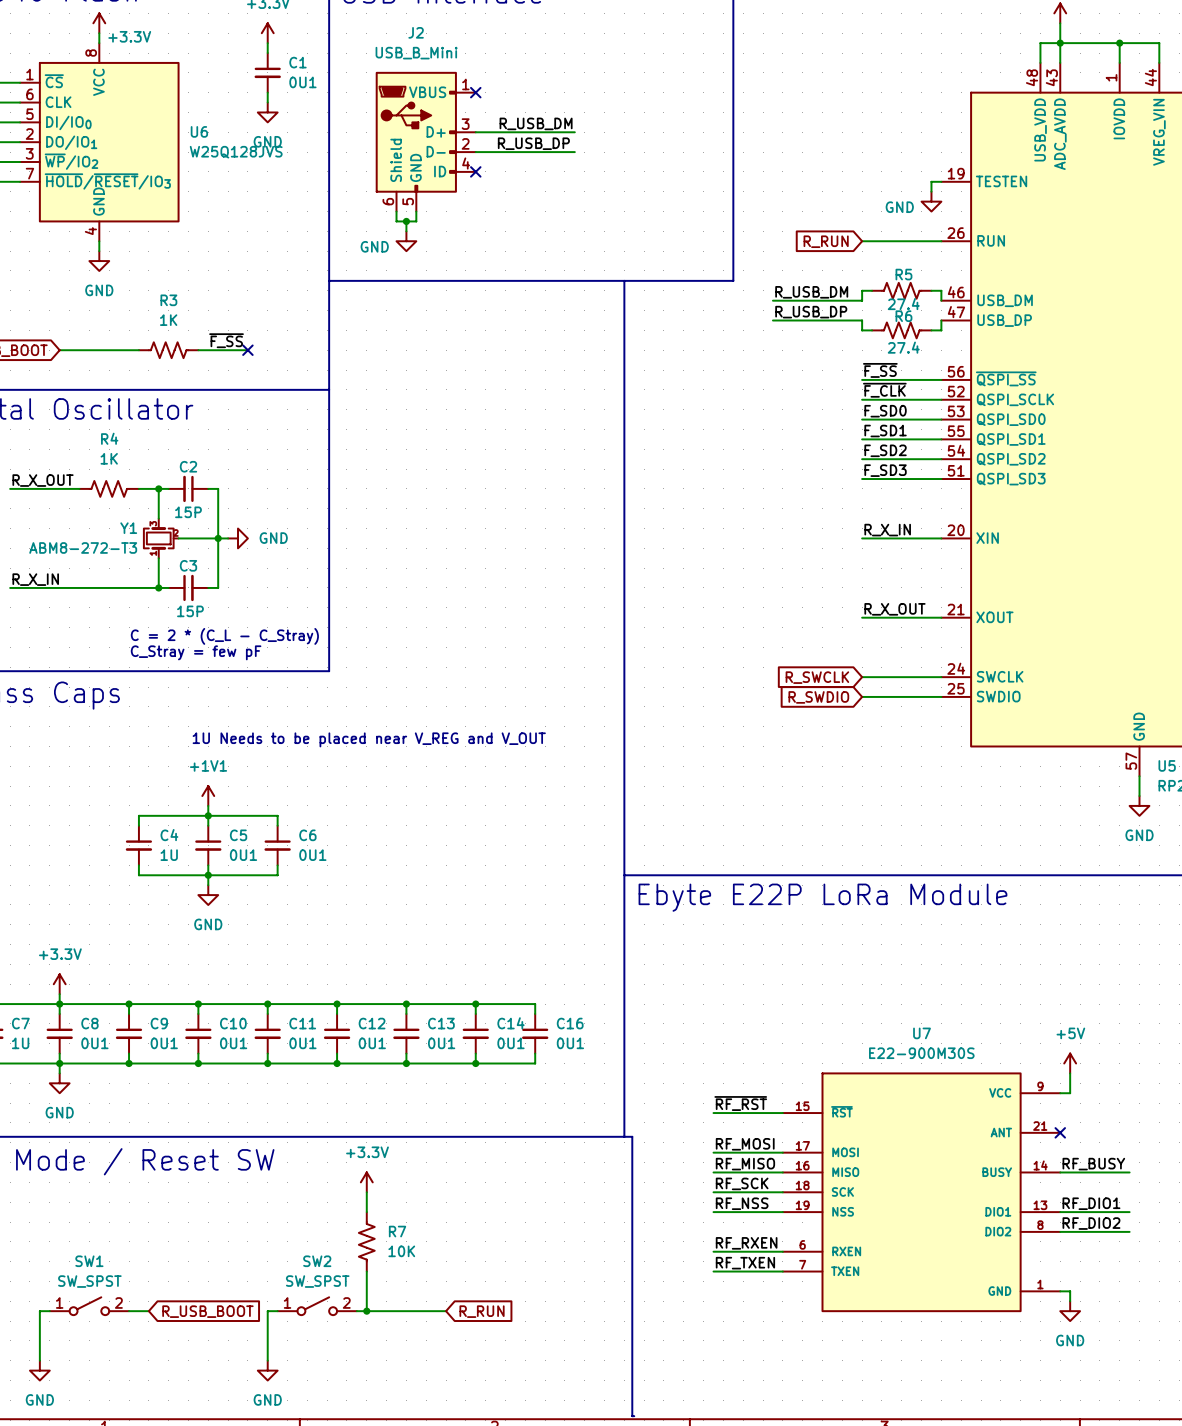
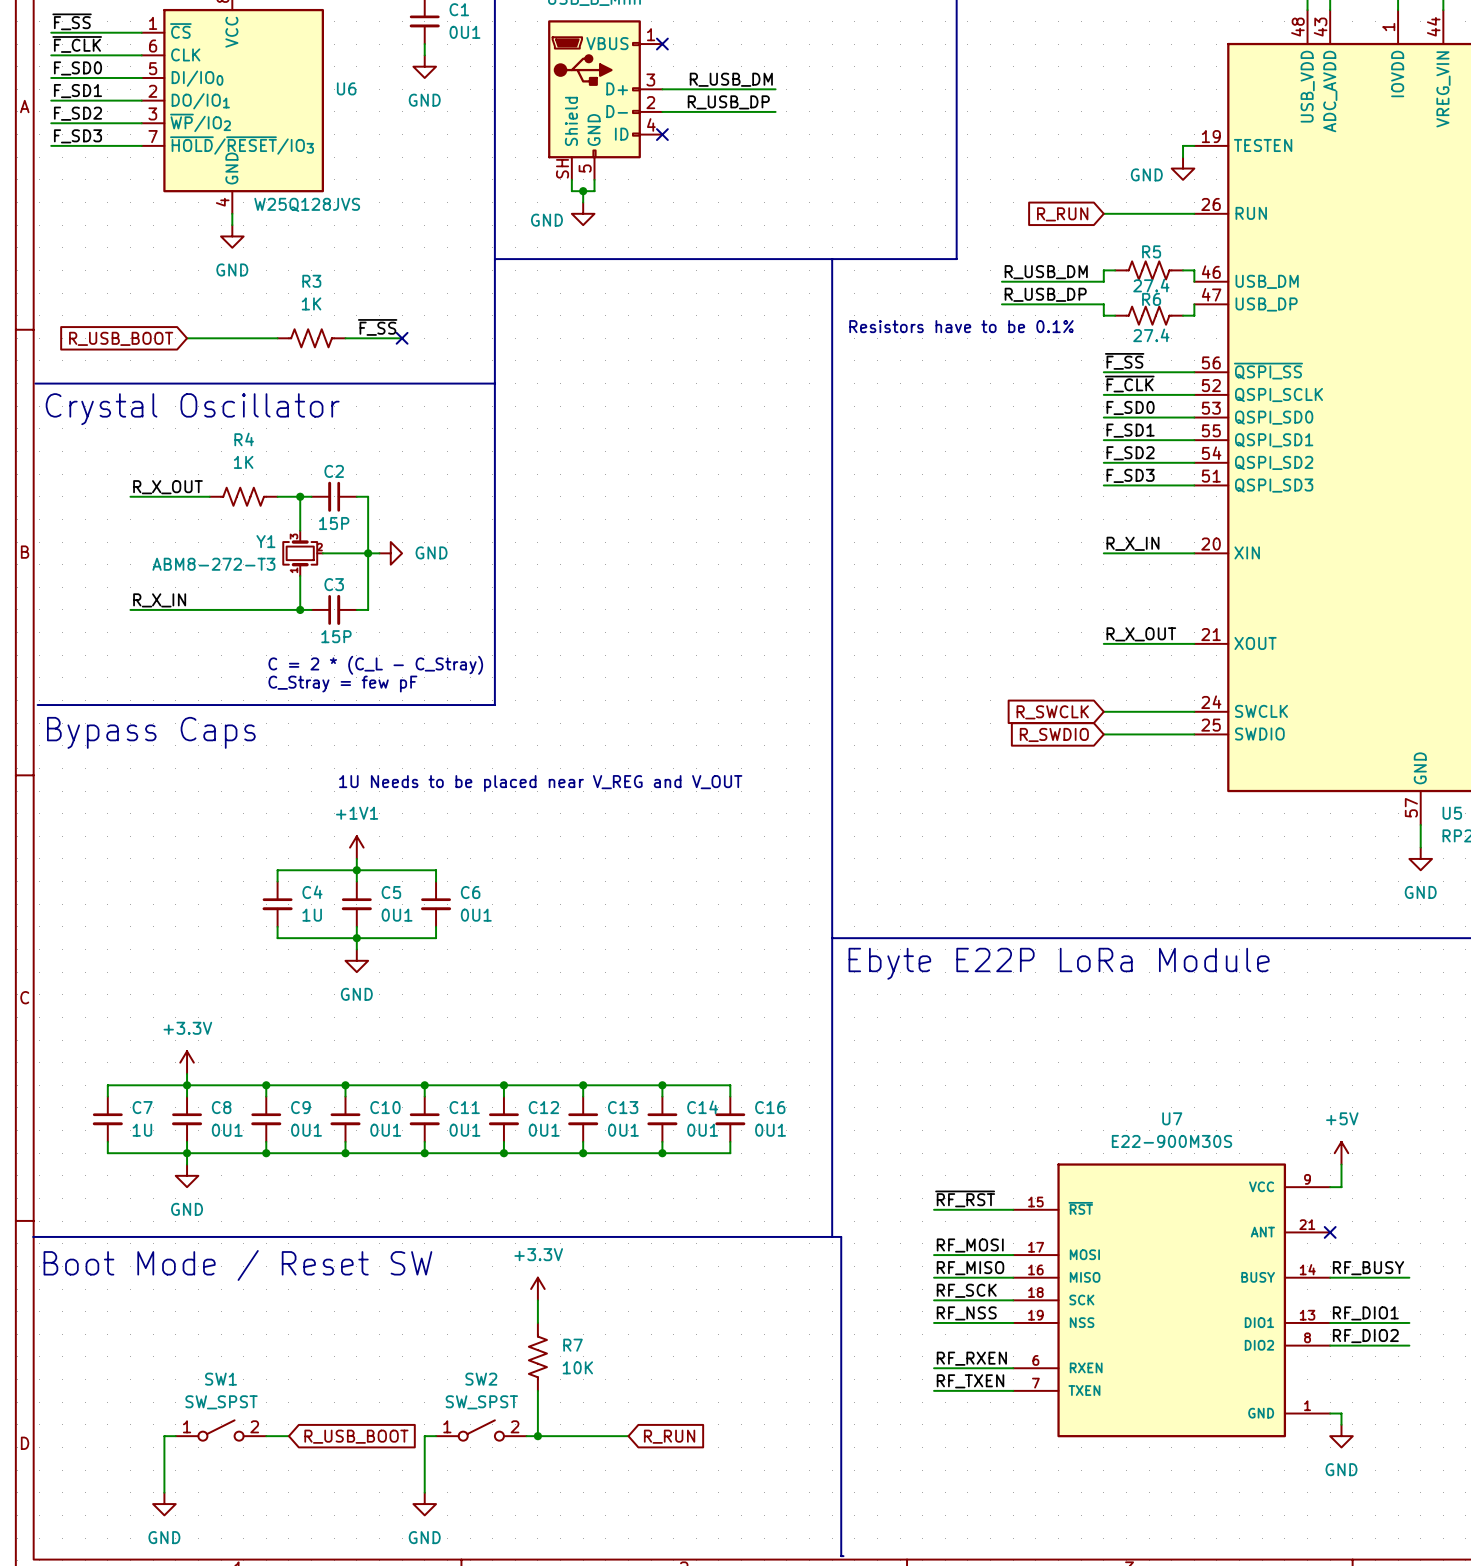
U6 value position: W25Q128JVS (236, 152) -> W25Q128JVS (307, 204)
J2 pin number: 6 (388, 201) -> SH (562, 168)
text: none -> Resistors have to be 0.1% (961, 326)

